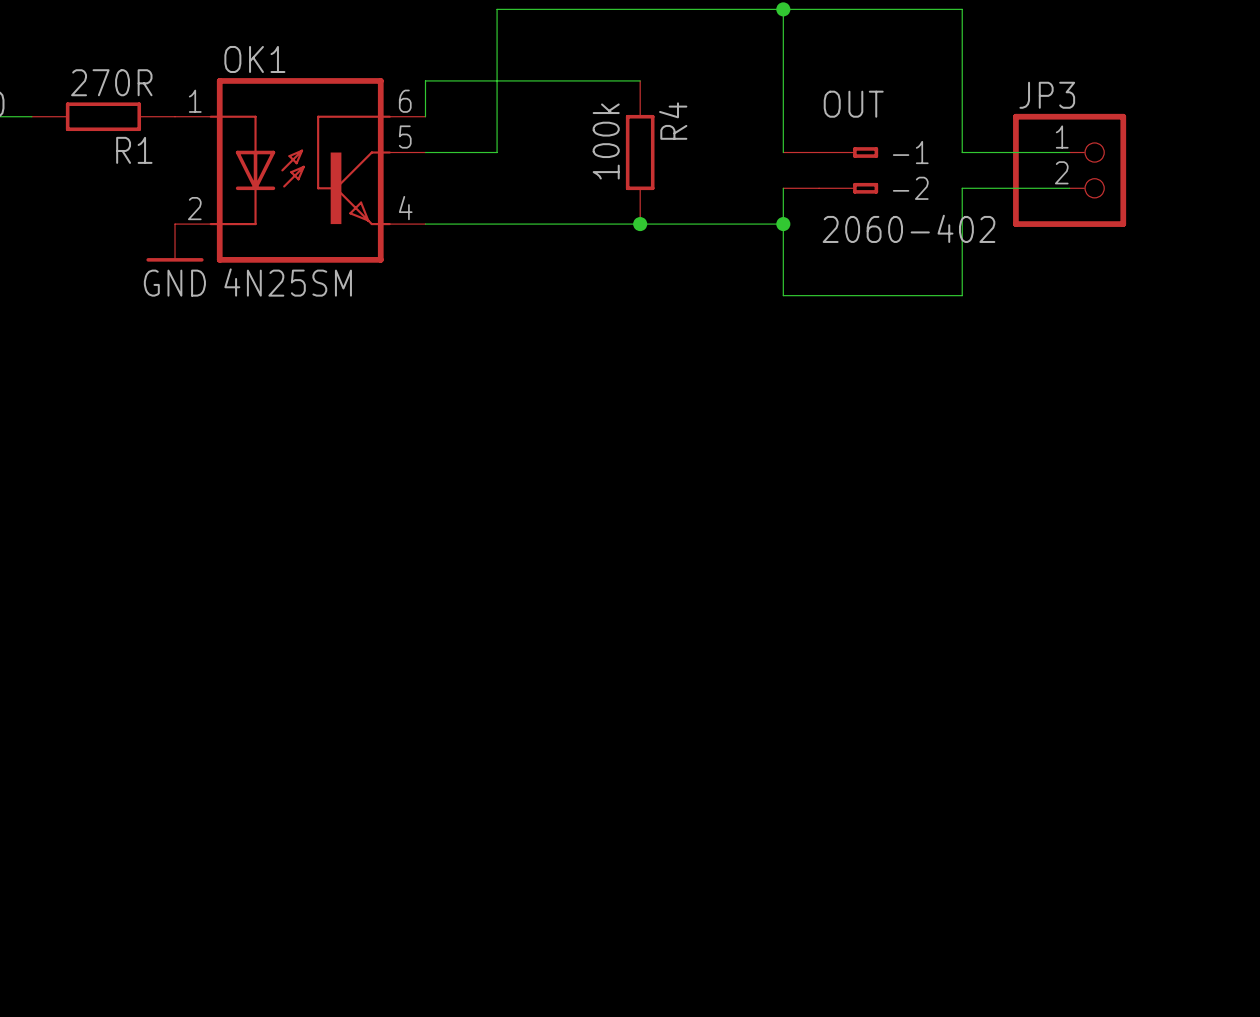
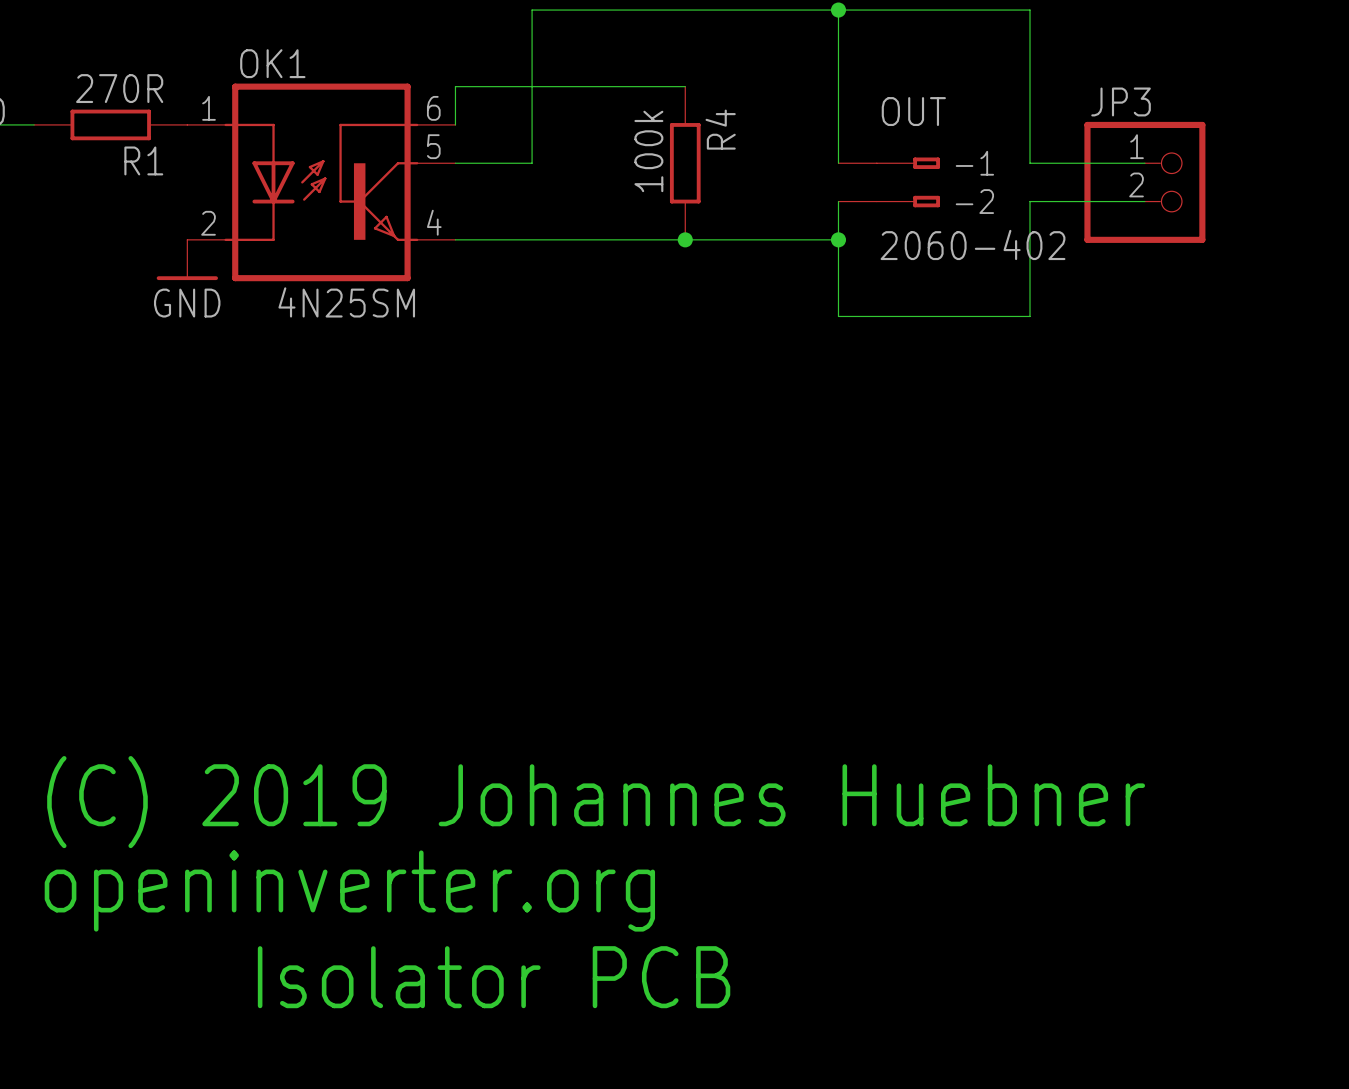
OK1 value position: 4N25SM (288, 282) -> 4N25SM (346, 302)
text: none -> (C) 2019 Johannes Huebner (596, 802)
text: none -> openinverter.org (349, 891)
text: none -> Isolator PCB (494, 977)

